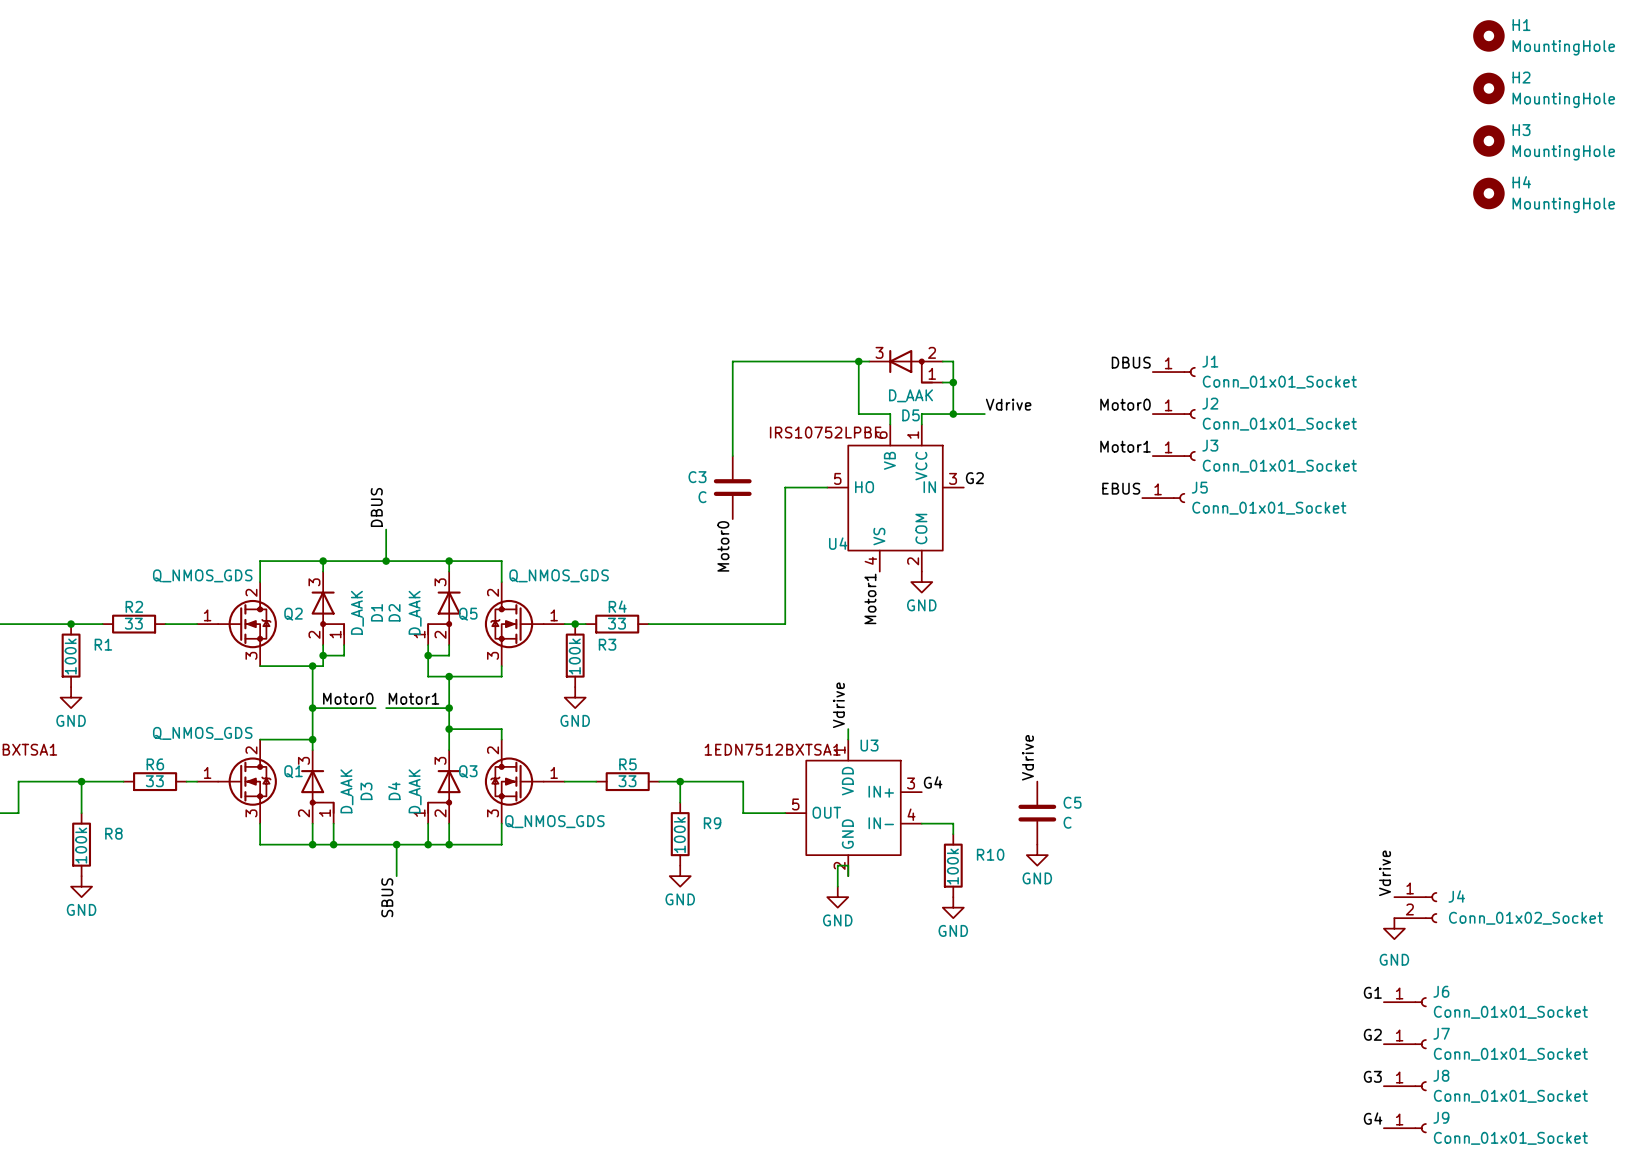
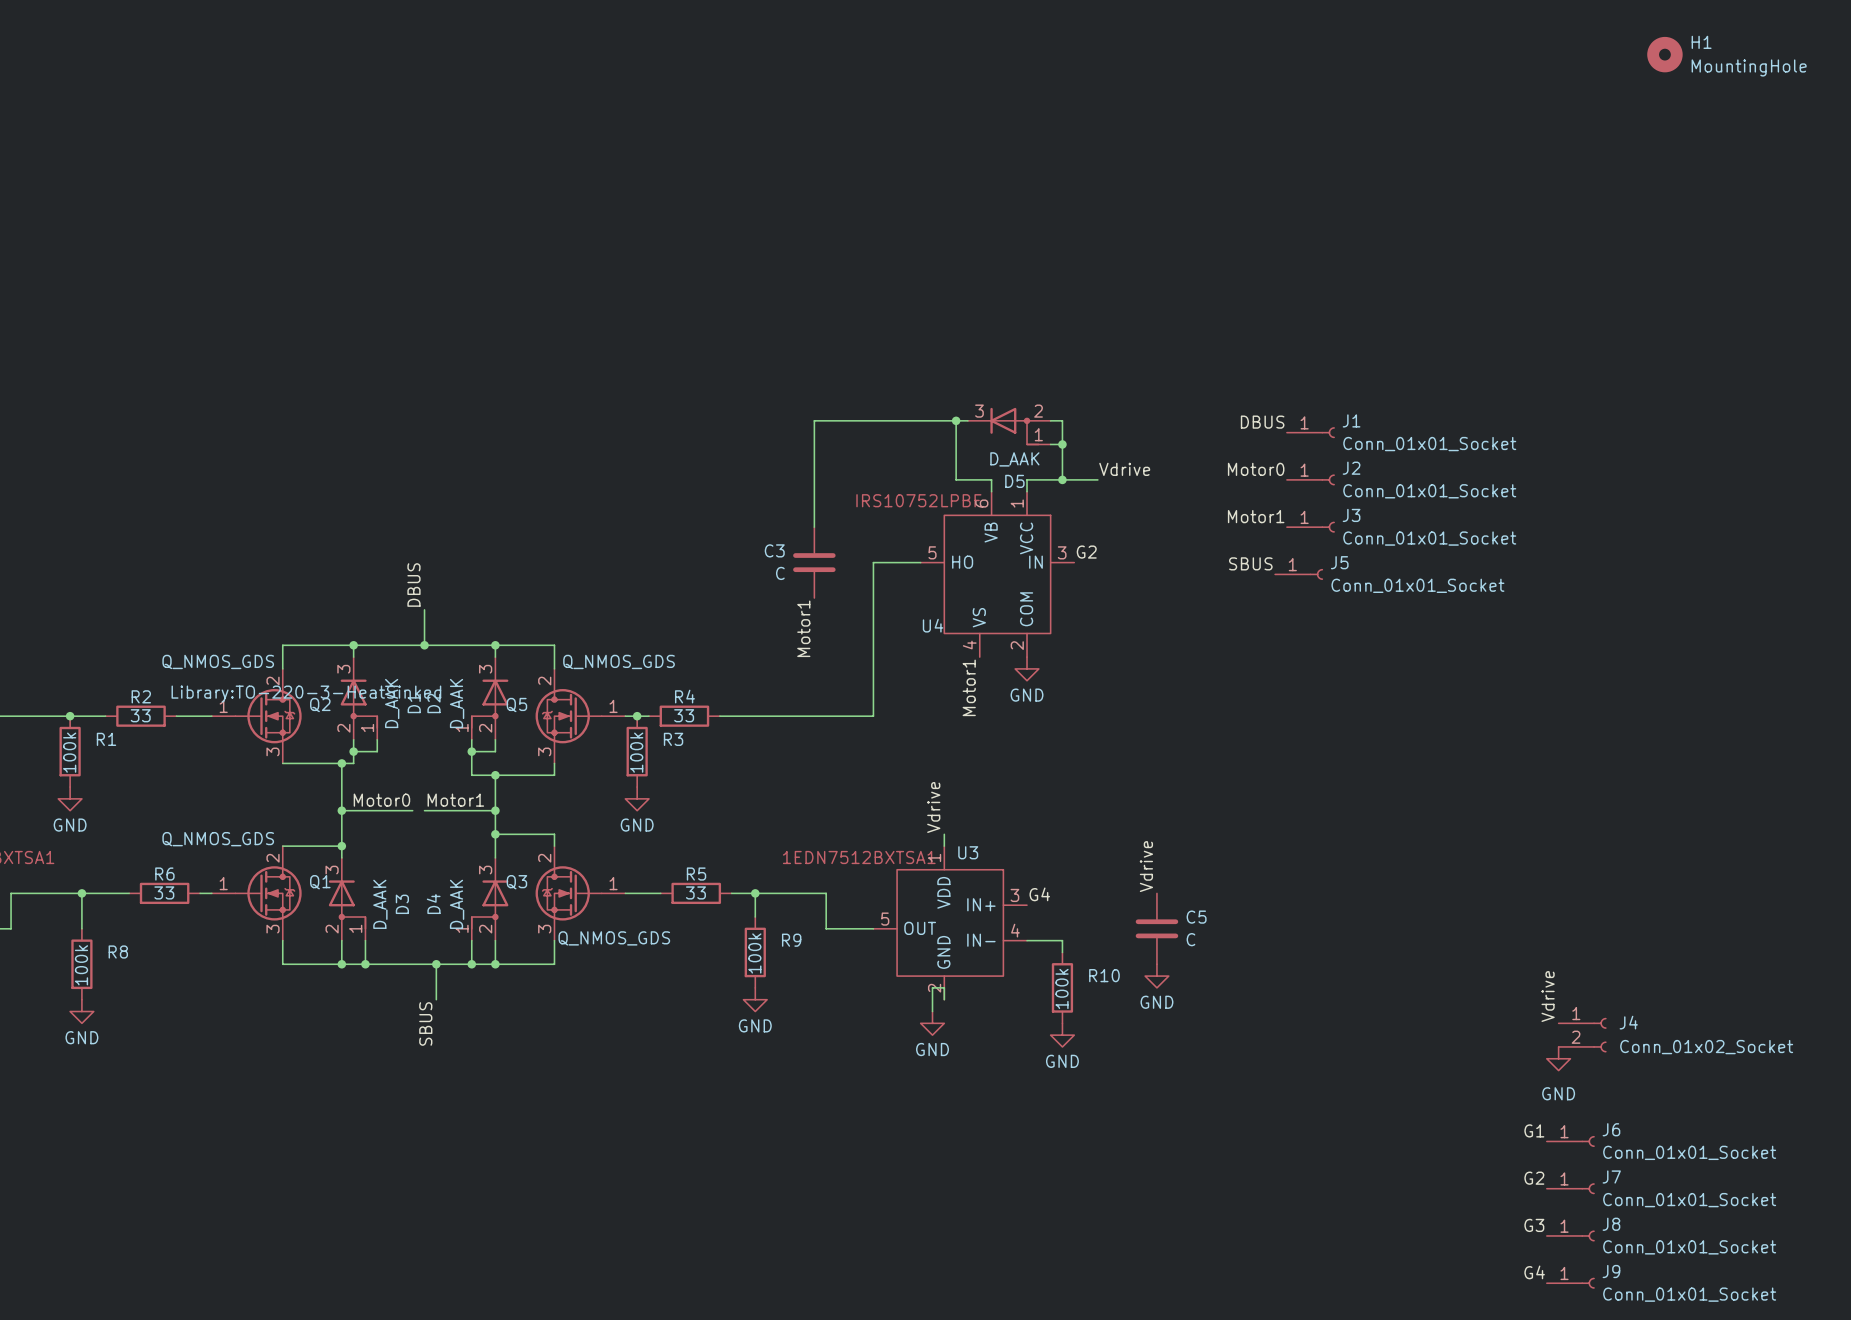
H2: MountingHole (1488, 88) -> none
H3: MountingHole (1488, 140) -> none
H4: MountingHole (1488, 193) -> none
label: EBUS (1121, 488) -> SBUS (1250, 563)
label: Motor0 (723, 546) -> Motor1 (803, 628)
Q2 text: none -> Library:TO-220-3-HeatSinked (306, 694)

